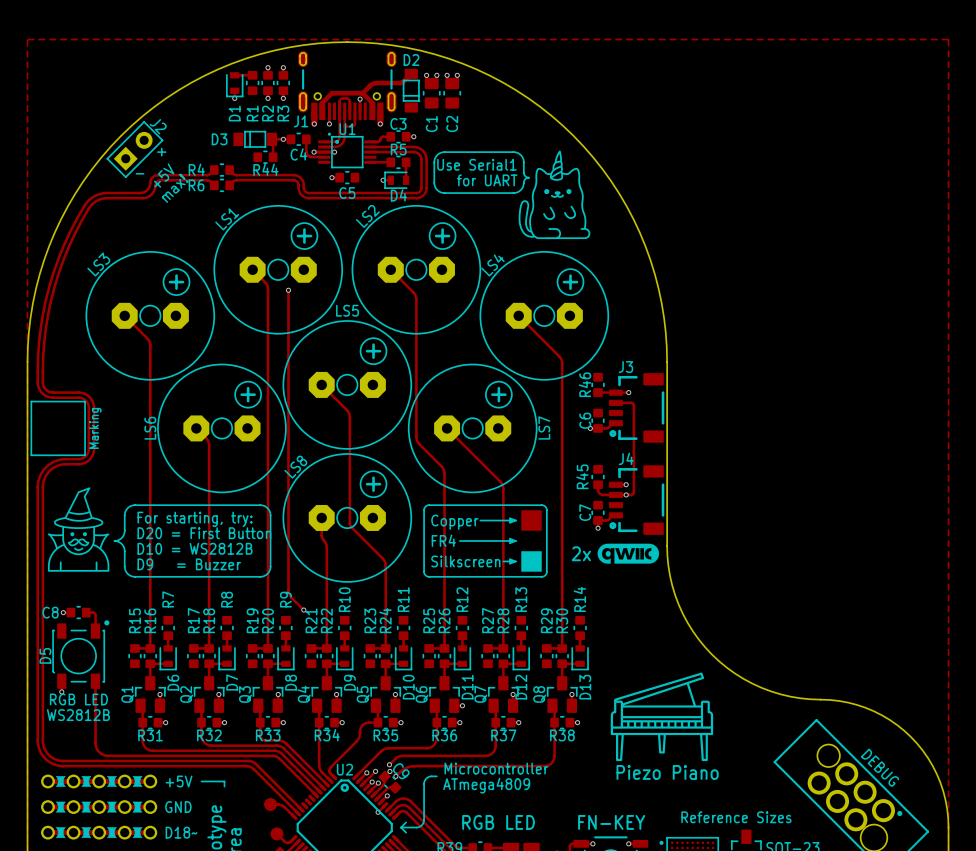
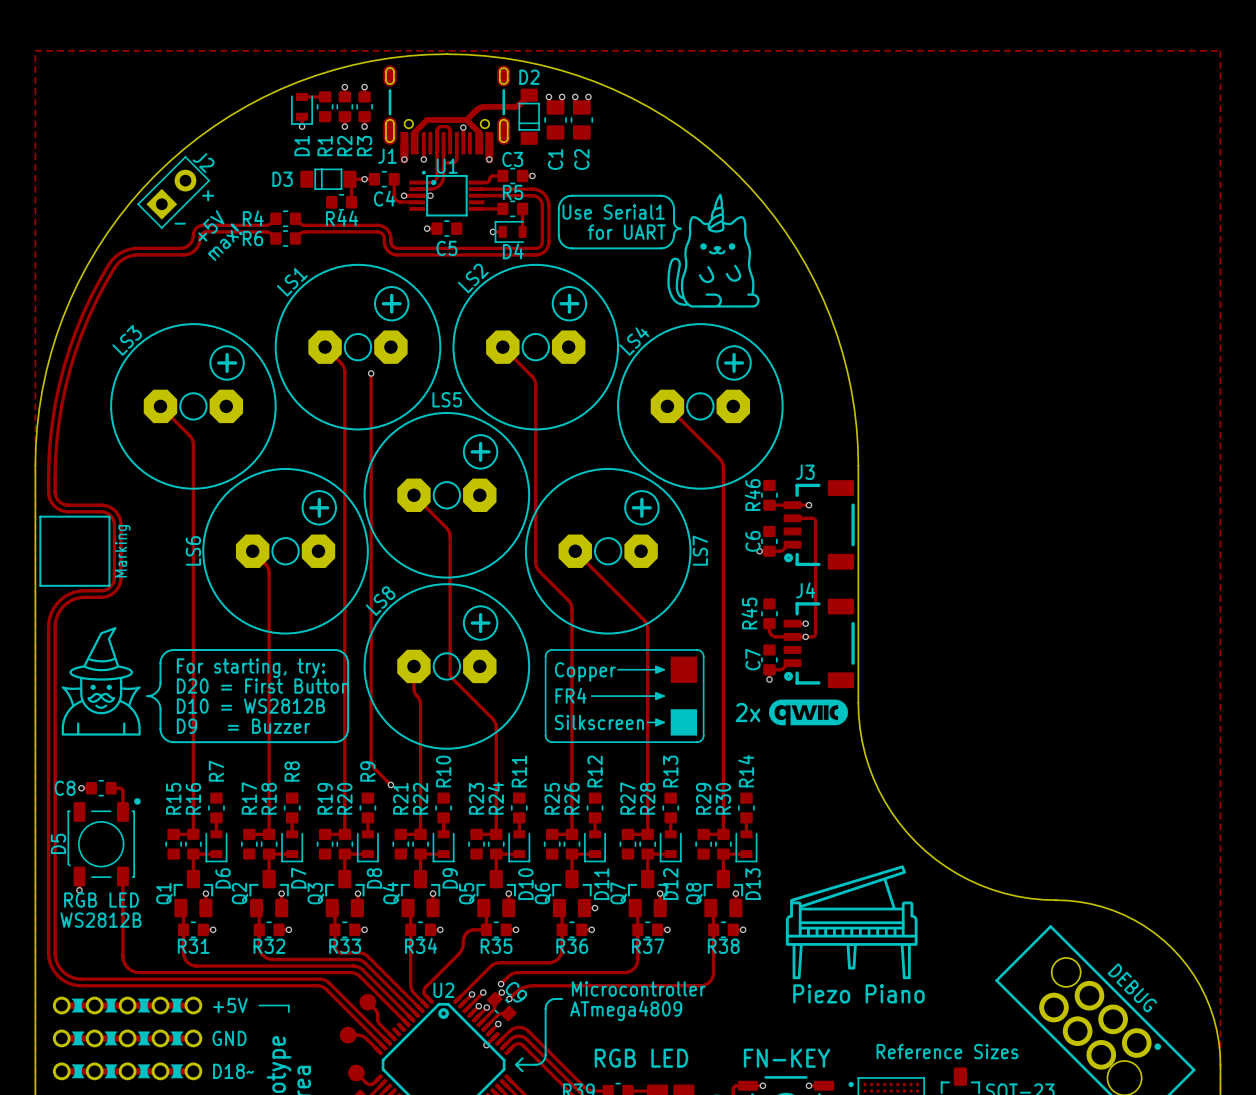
track: none -> (367, 1002) (376, 1011) (379, 1023) (392, 1036)
part: none -> (367, 1002)

